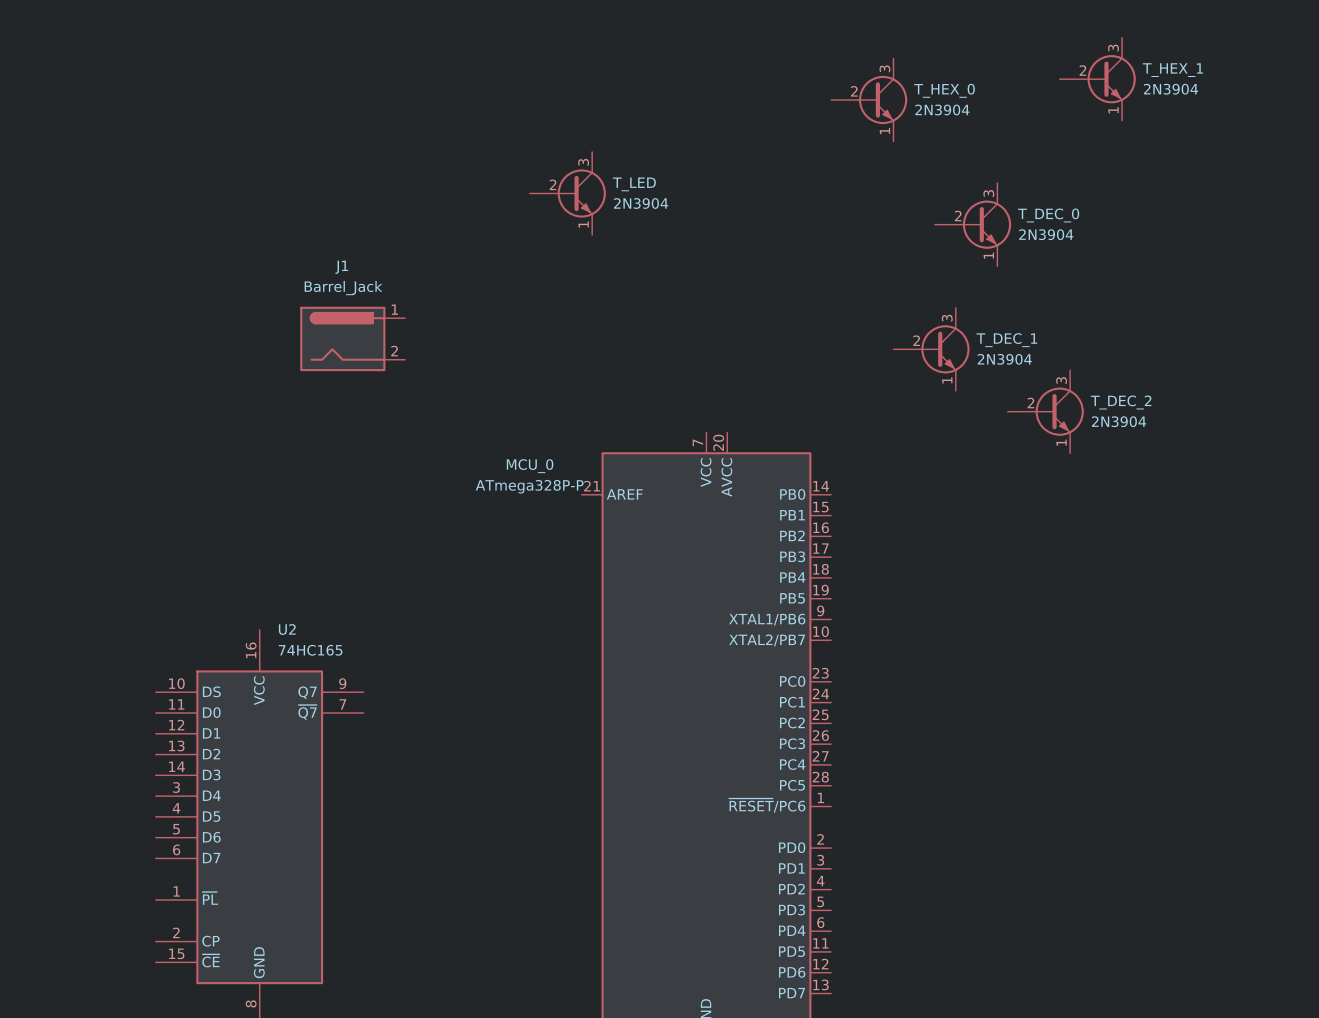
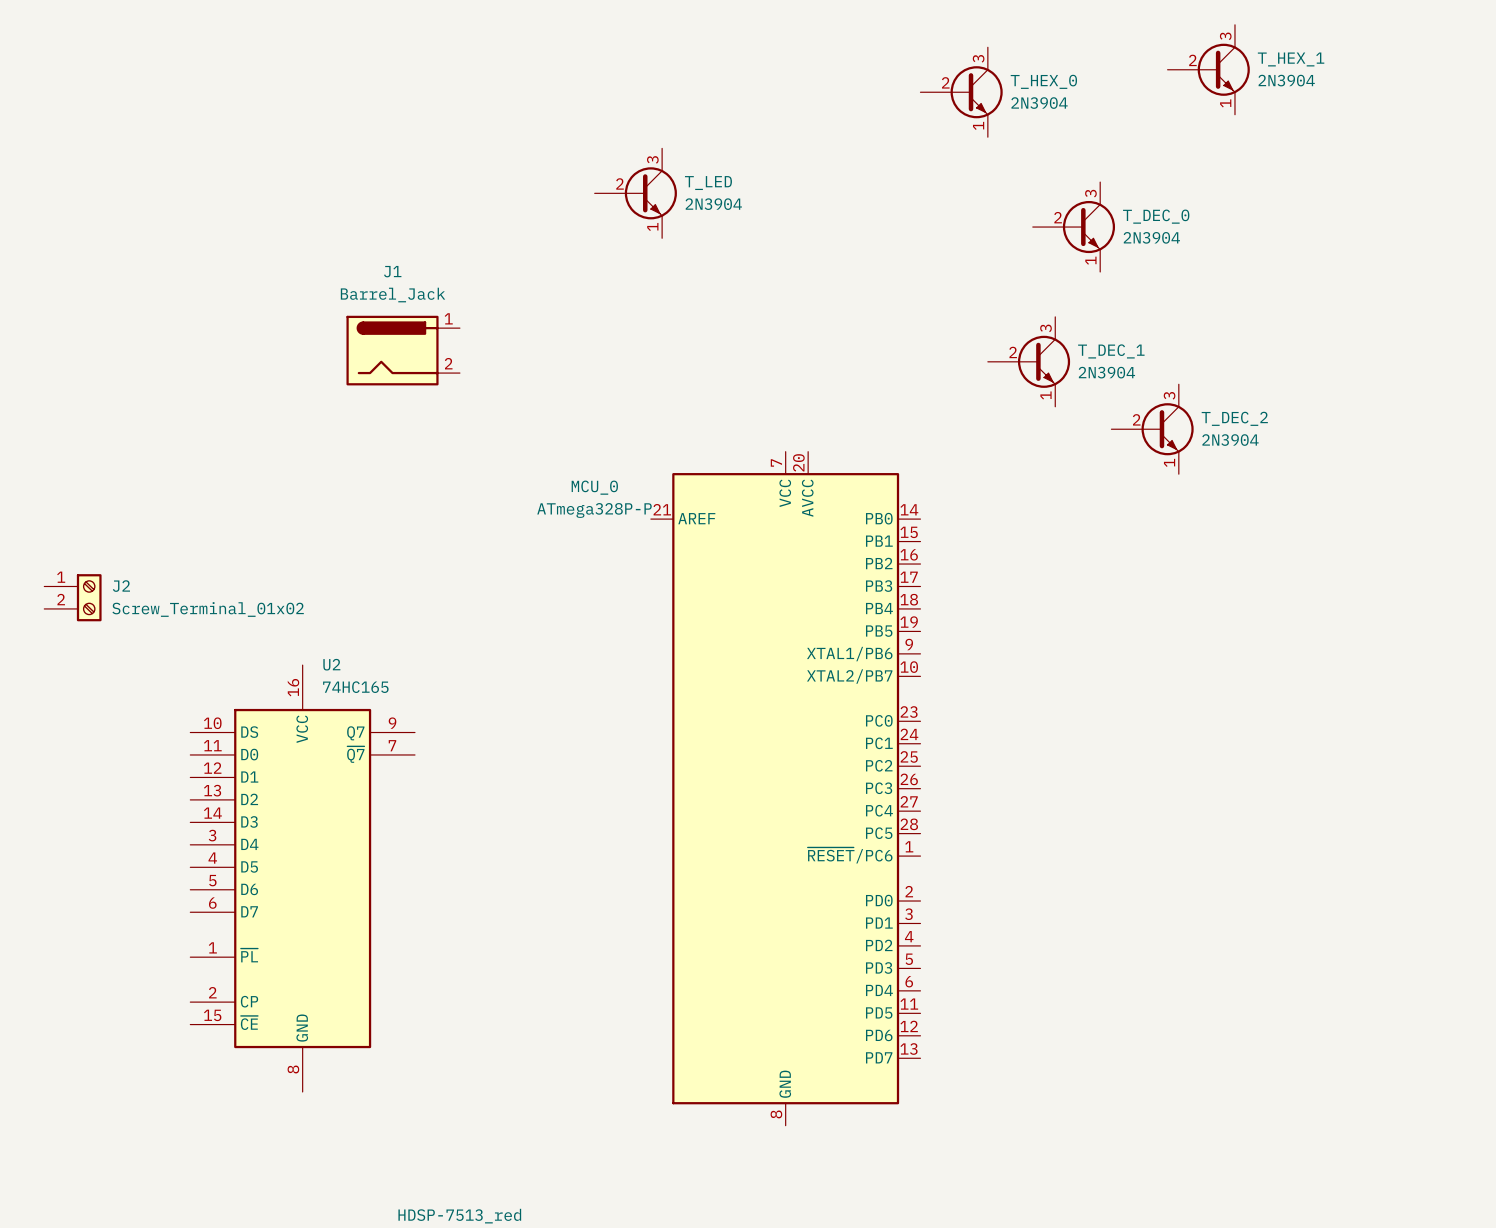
J2: none -> Screw_Terminal_01x02 (72, 597)

